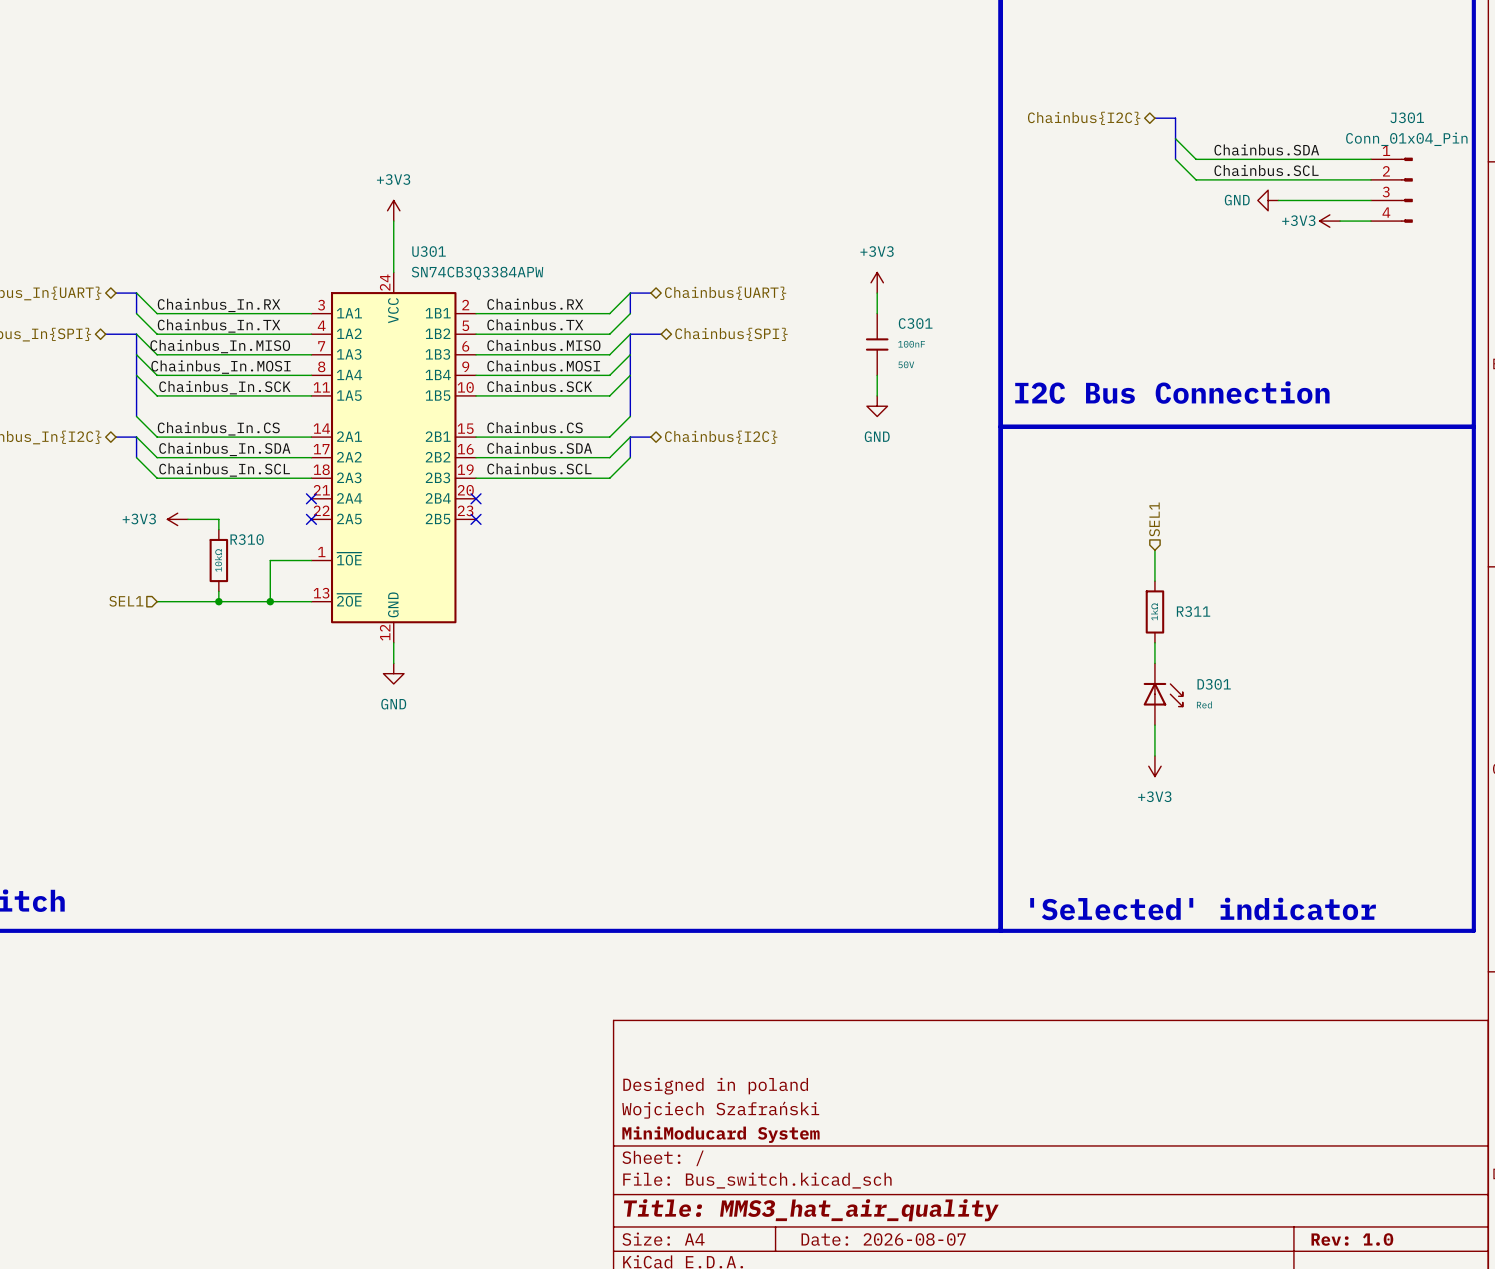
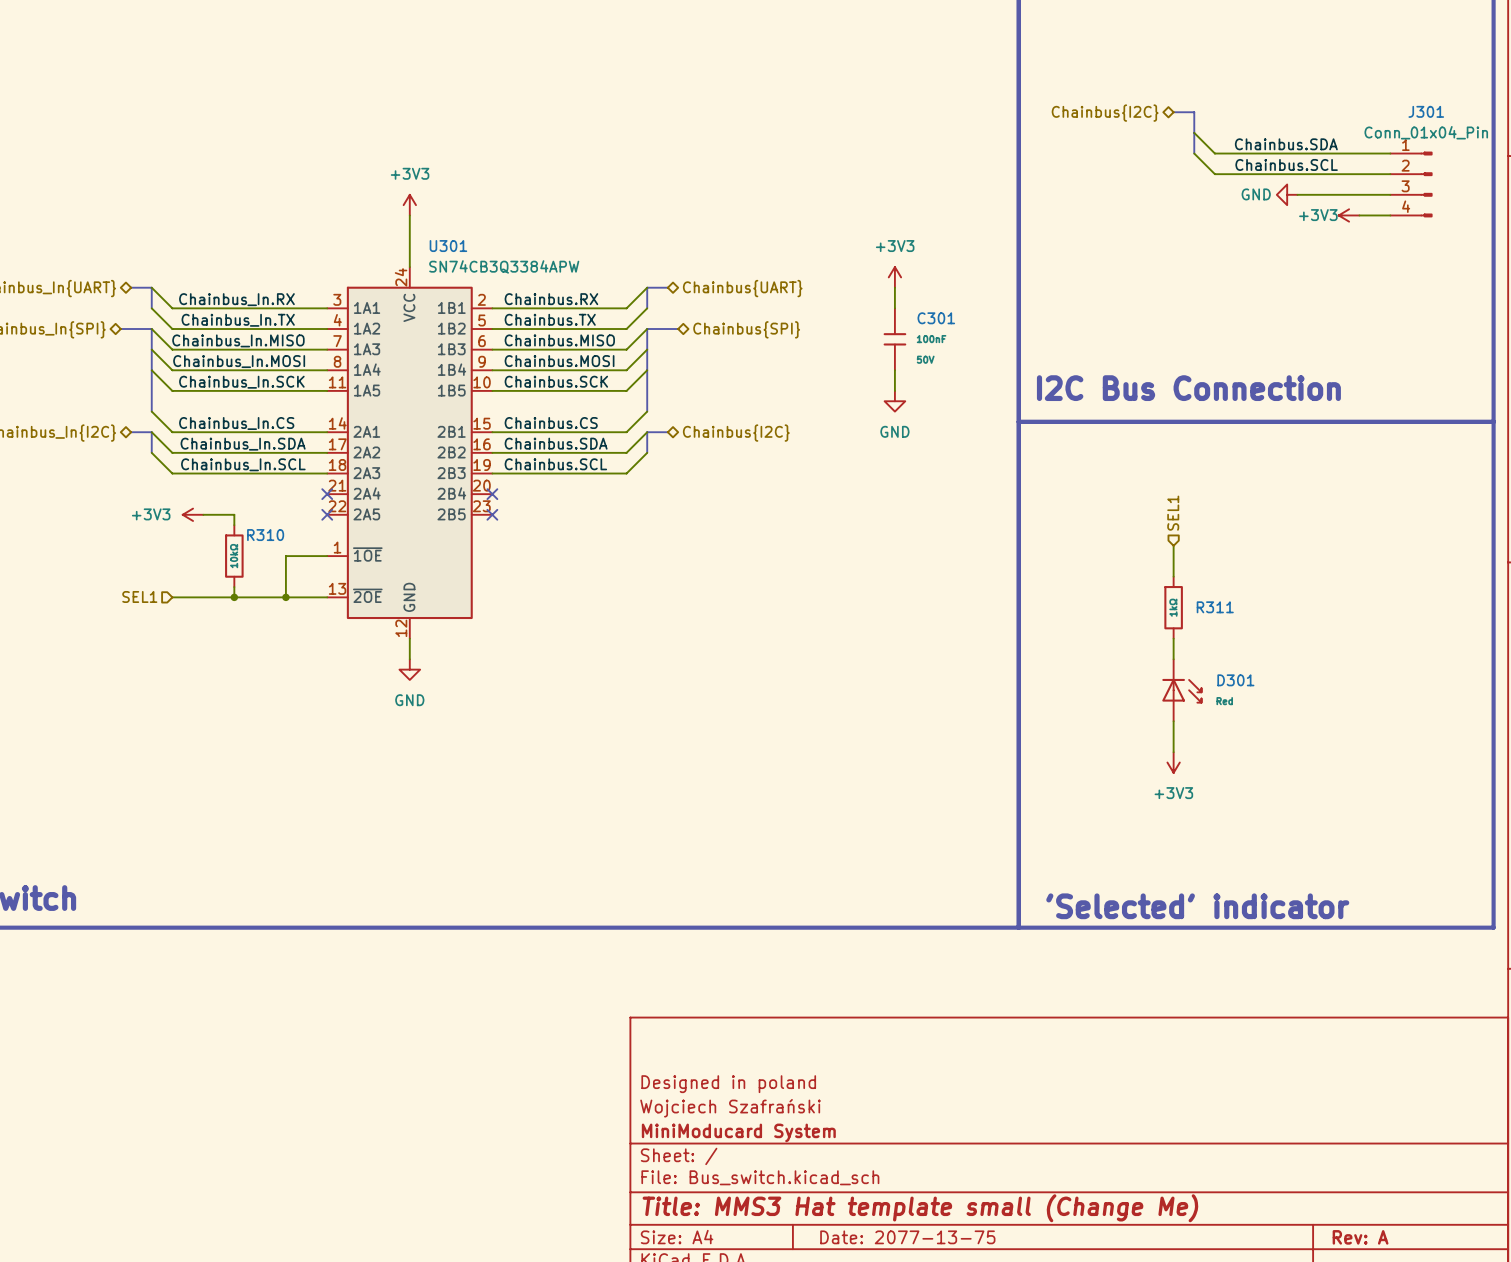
title block: Title: MMS3_hat_air_quality (811, 1210) -> Title: MMS3 Hat template small (Change Me) (920, 1208)
title block: Date: 2026-08-07 (883, 1239) -> Date: 2077-13-75 (907, 1237)
title block: Rev: 1.0 (1352, 1239) -> Rev: A (1360, 1237)

